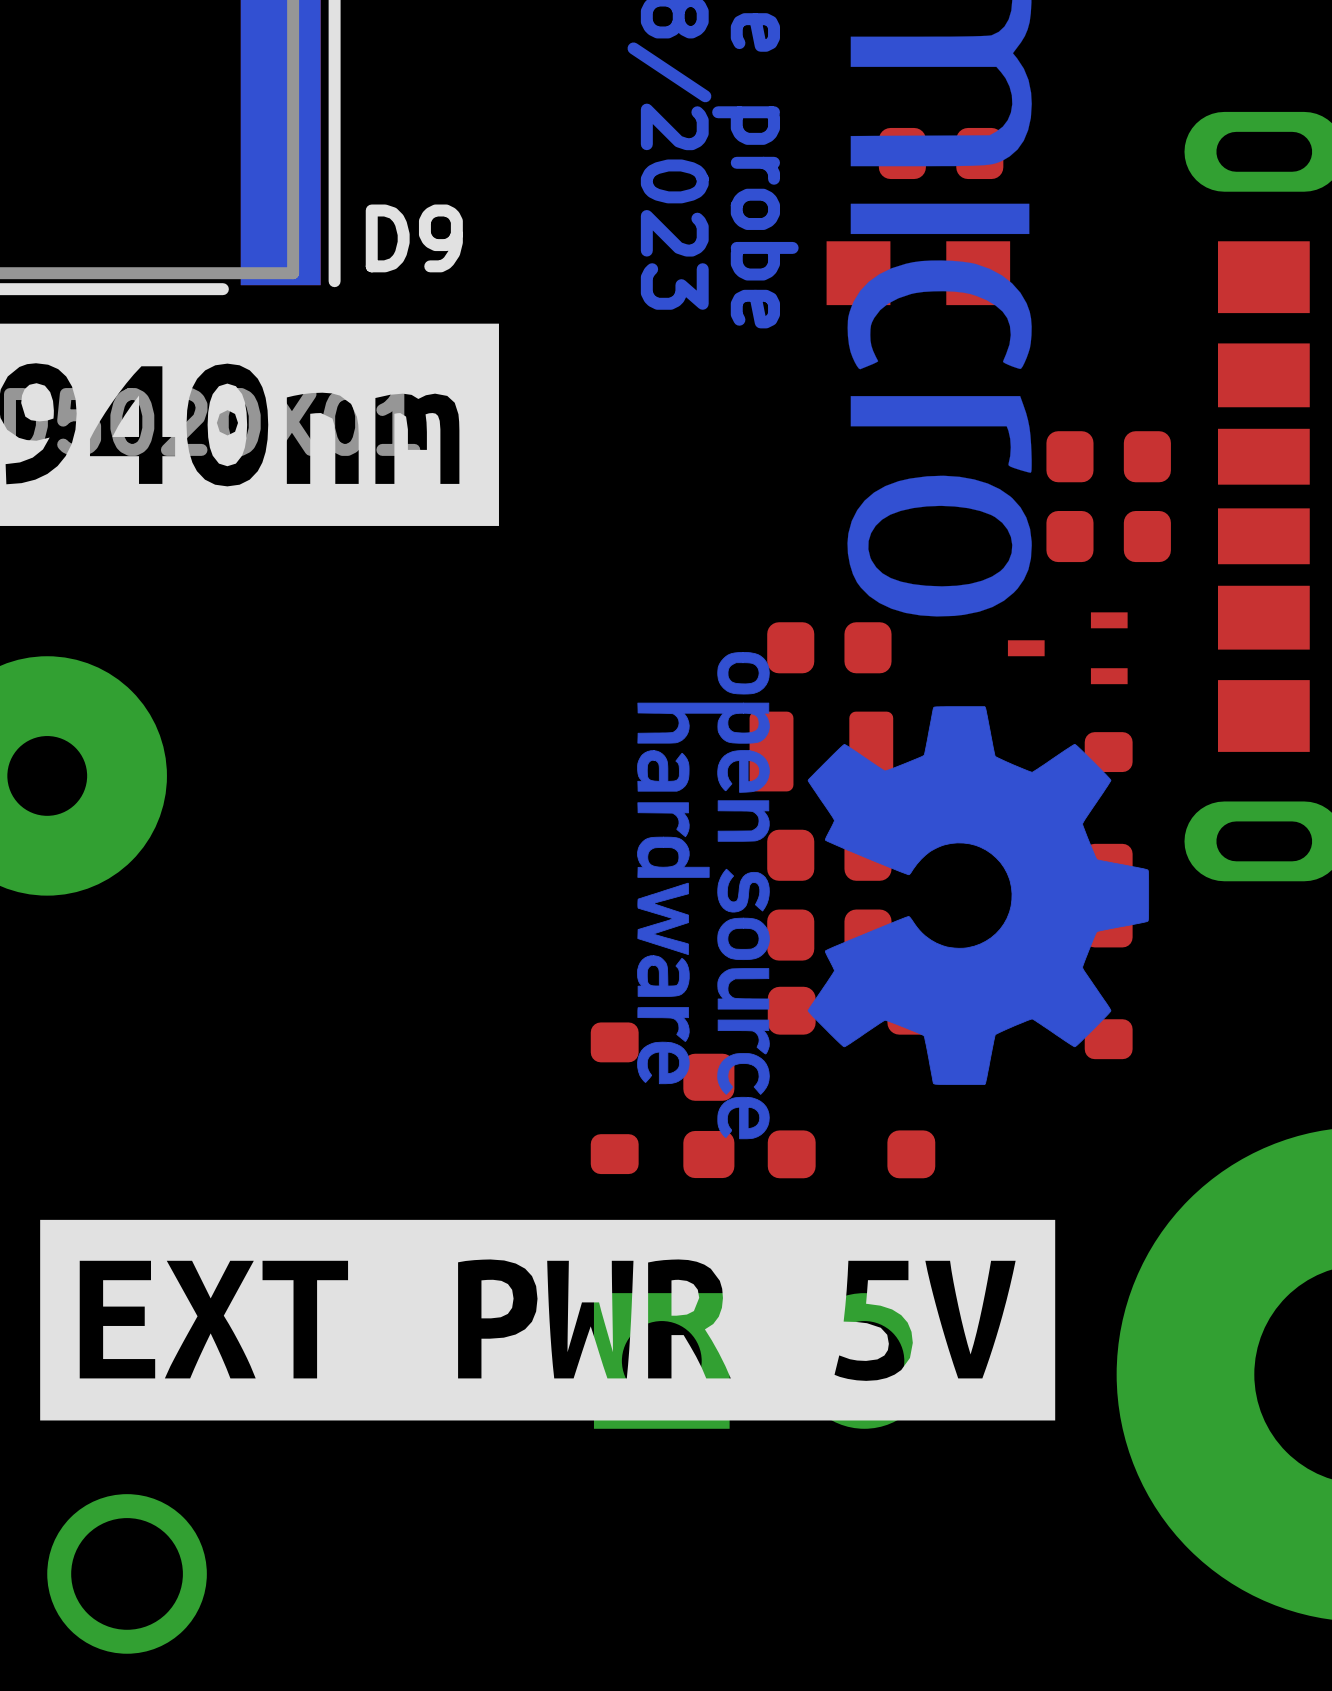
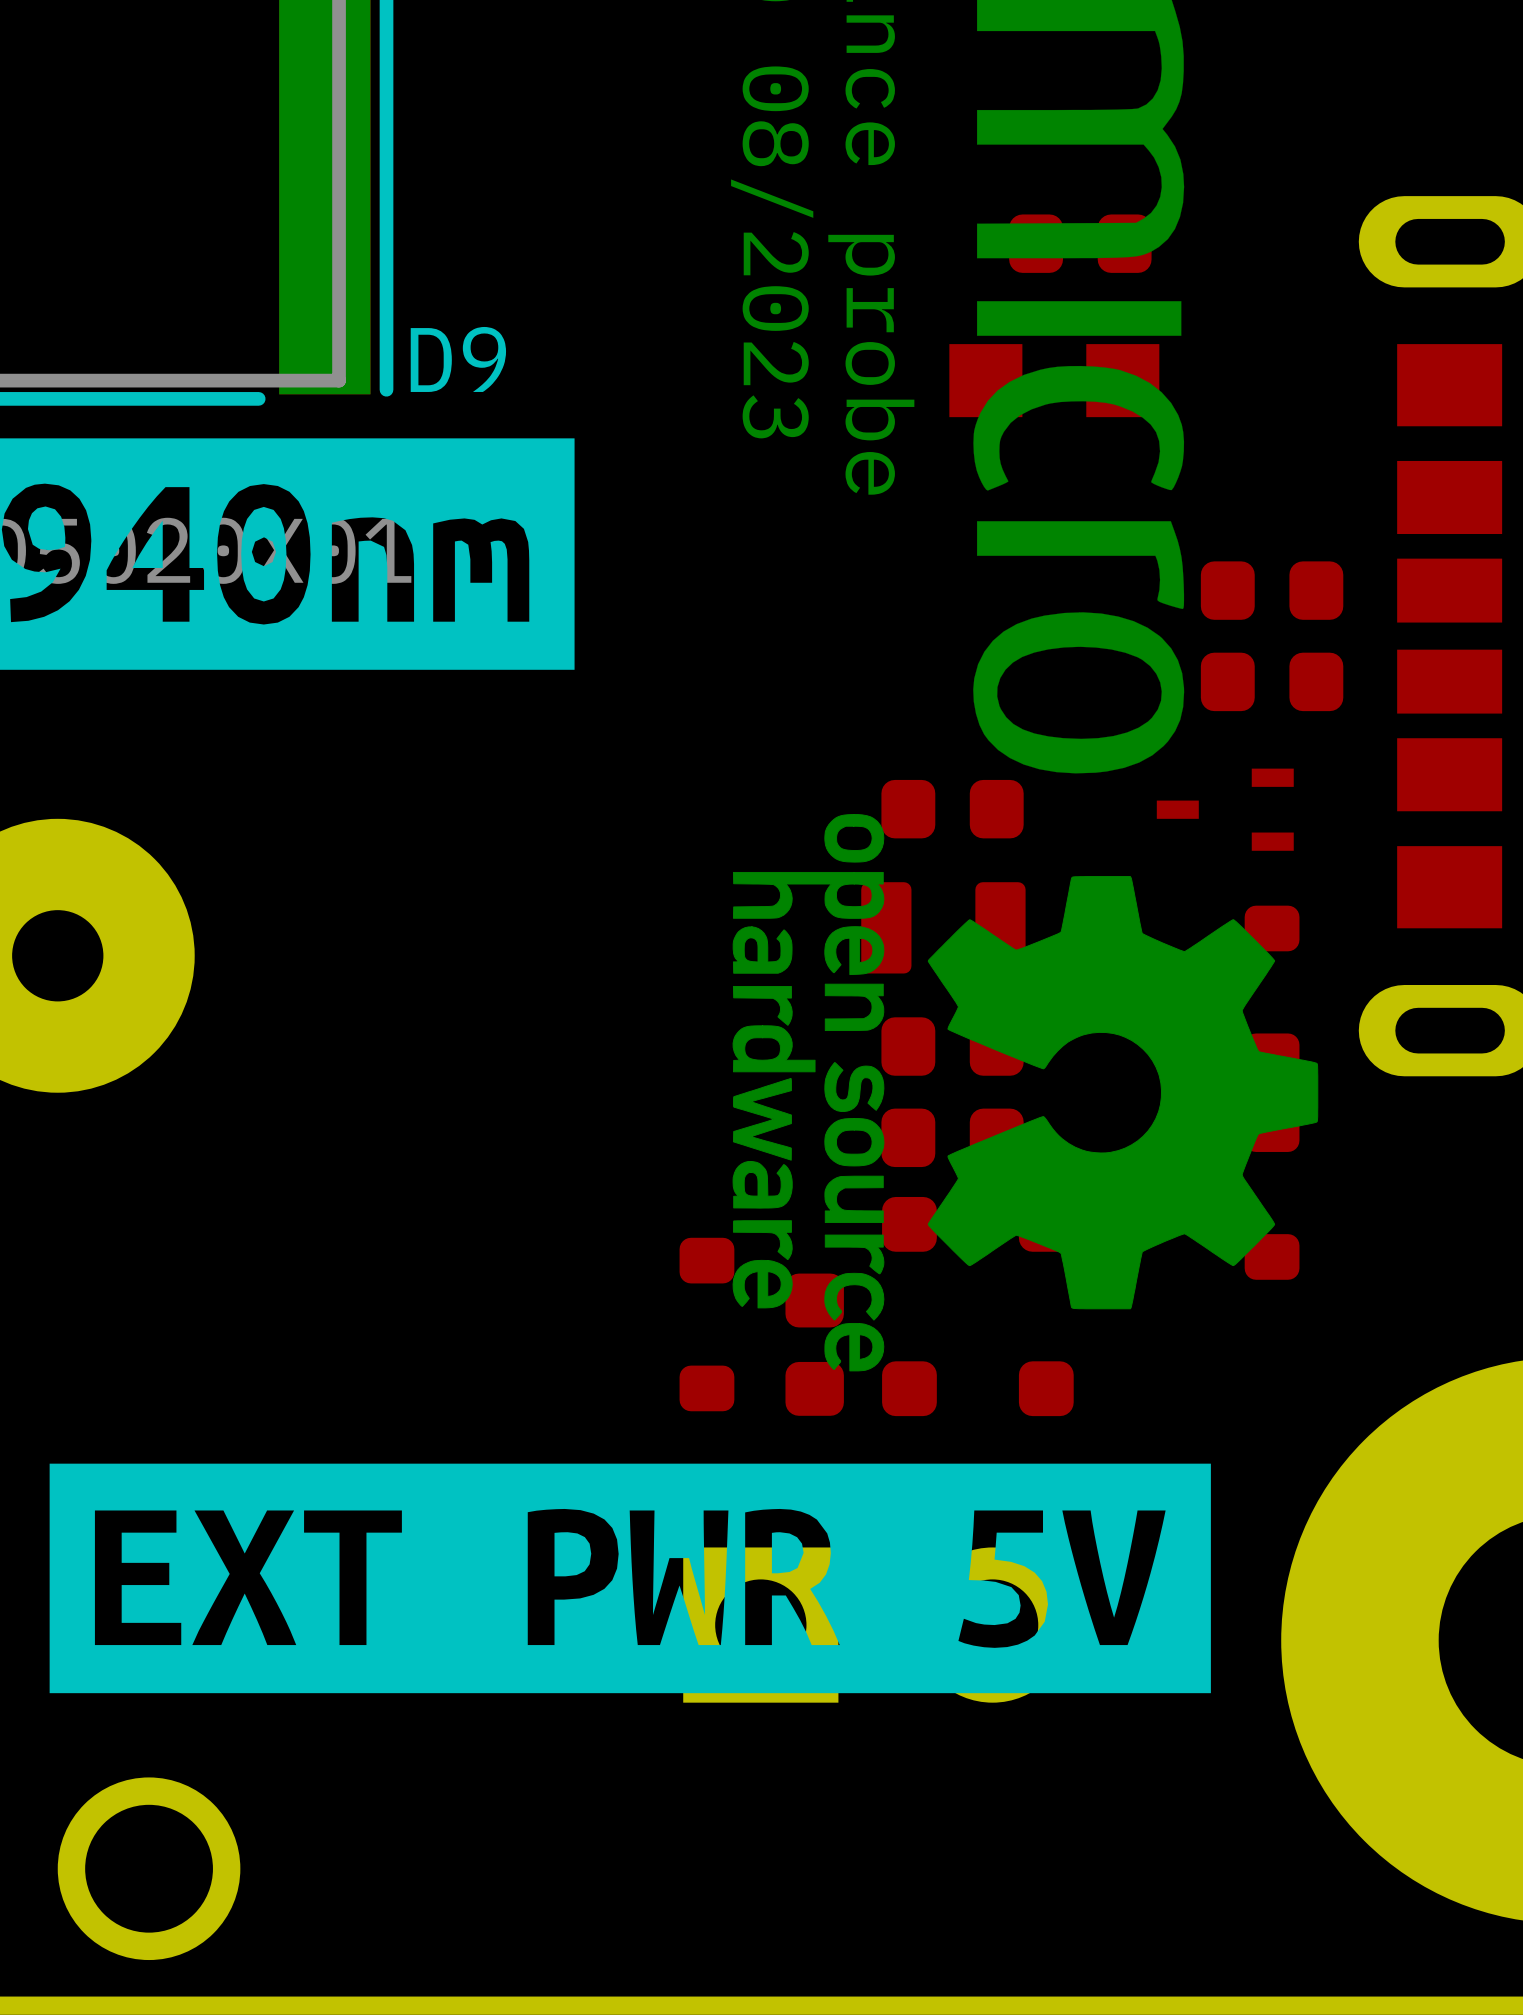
D9 name position: D9 (414, 238) -> D9 (458, 359)

